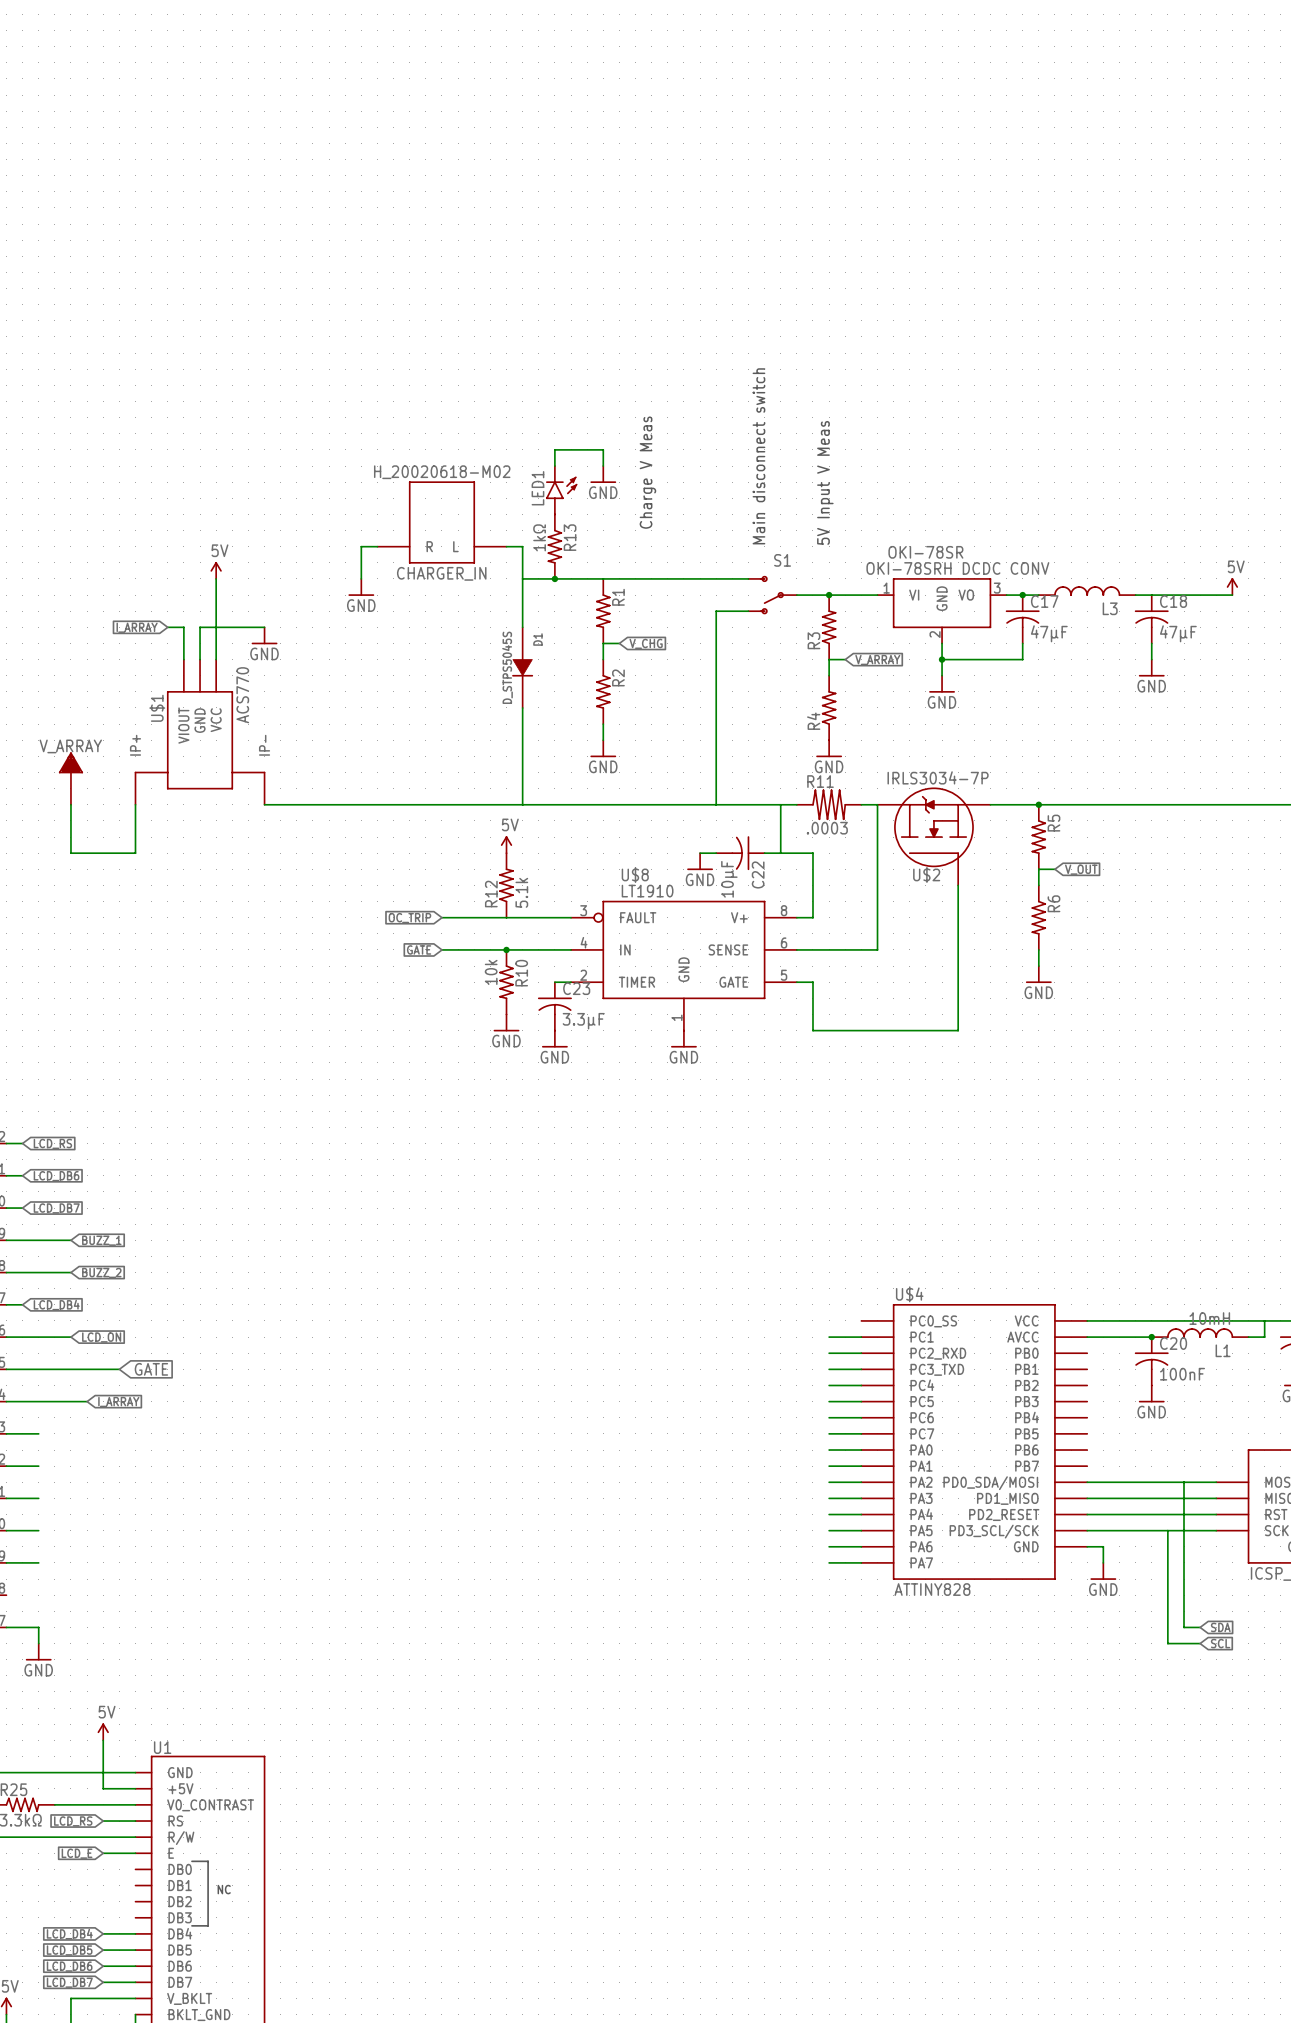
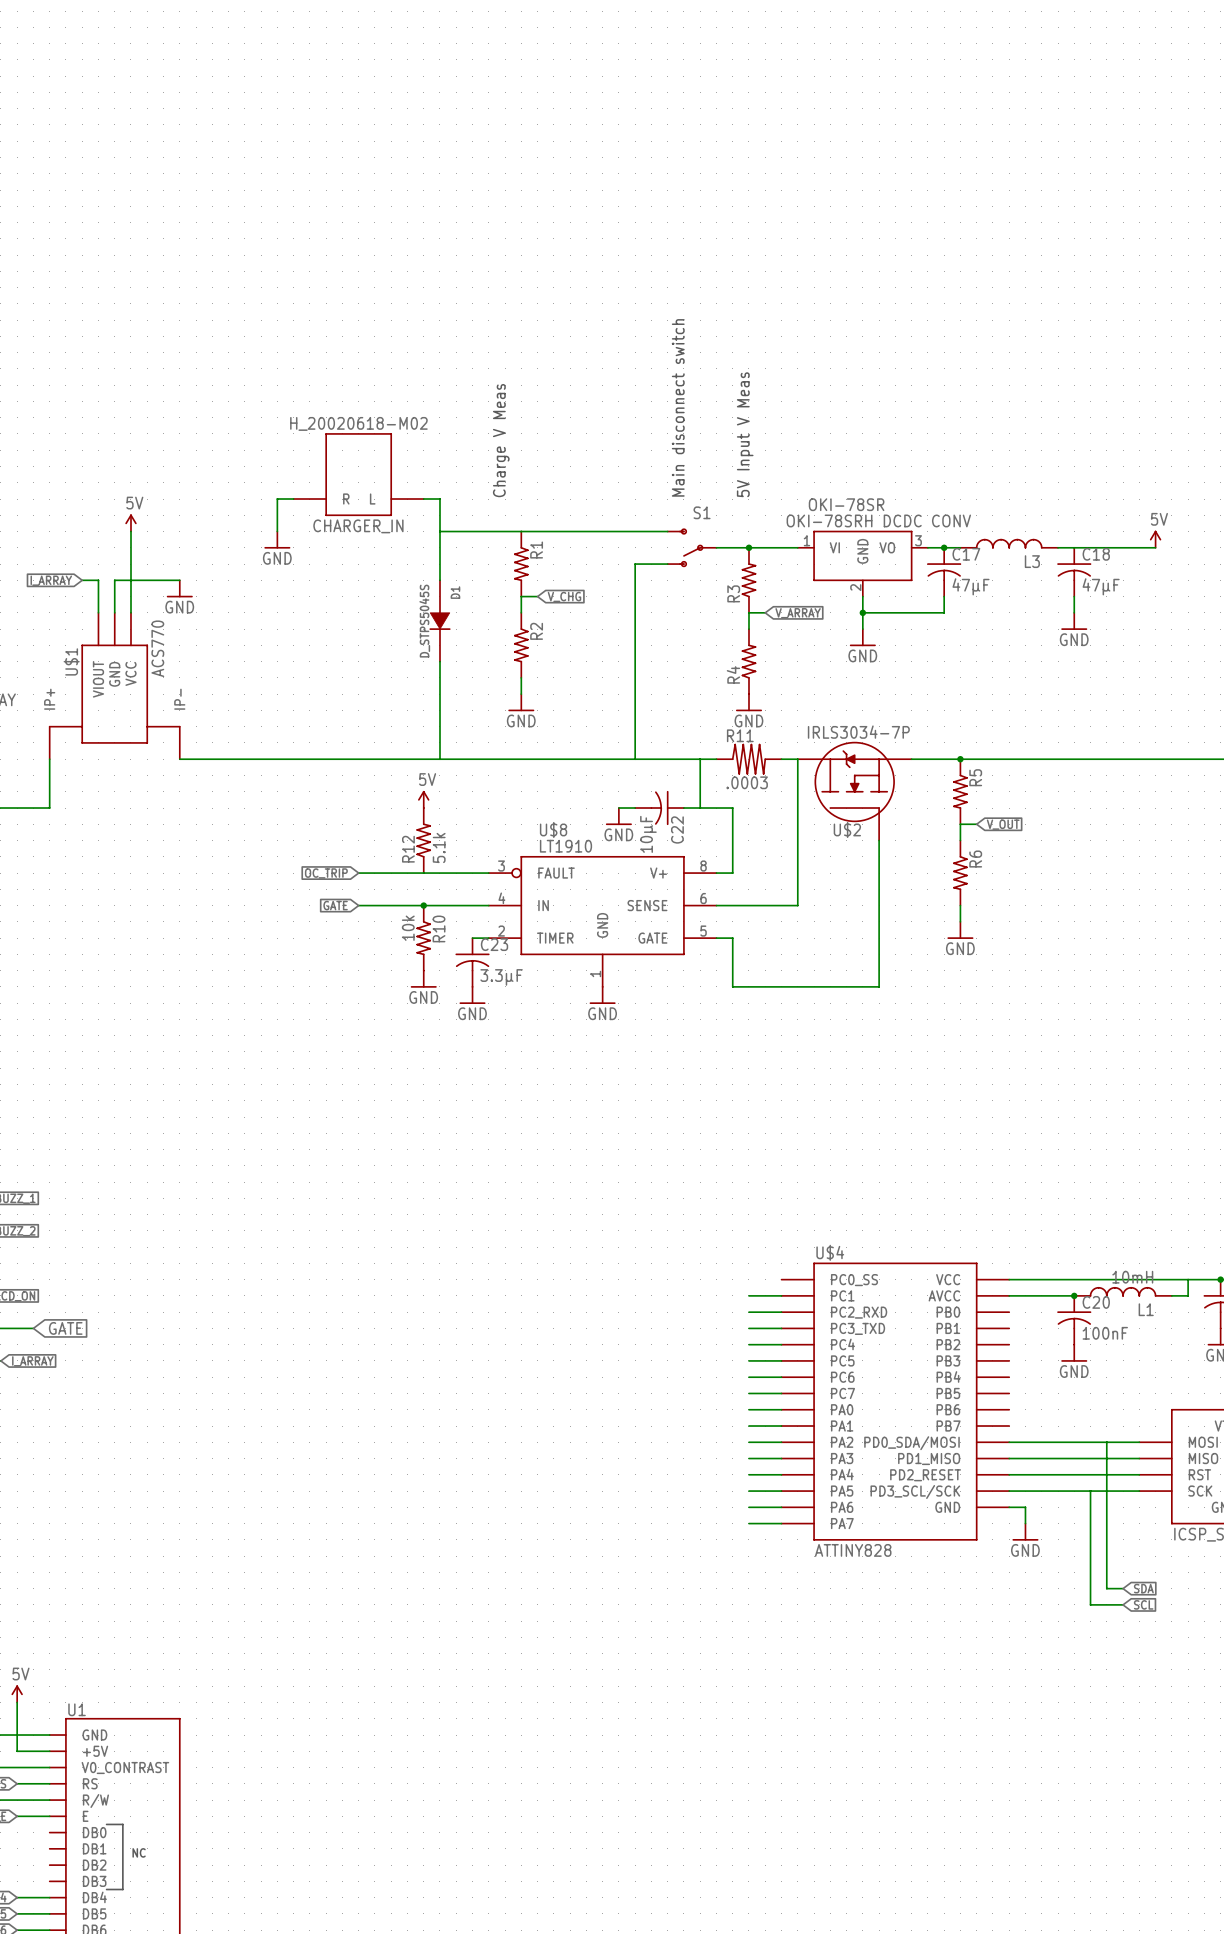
wire: (554, 466) (554, 449) (603, 449) (603, 466) -> none
text position: Charge V Meas (647, 472) -> Charge V Meas (501, 440)
power symbol: GND (603, 474) -> none
LED1: (561, 490) -> none
R13: 1kΩ (554, 546) -> none
junction: (554, 578) -> none

